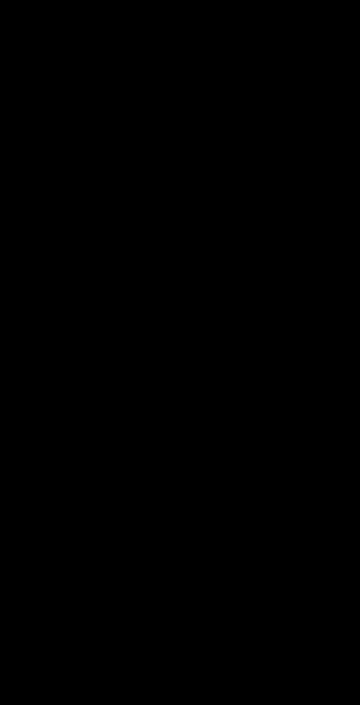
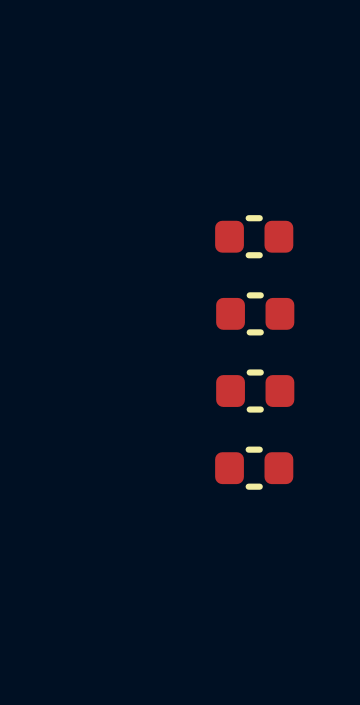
part: none -> (254, 236)
part: none -> (255, 313)
part: none -> (255, 391)
part: none -> (254, 468)

